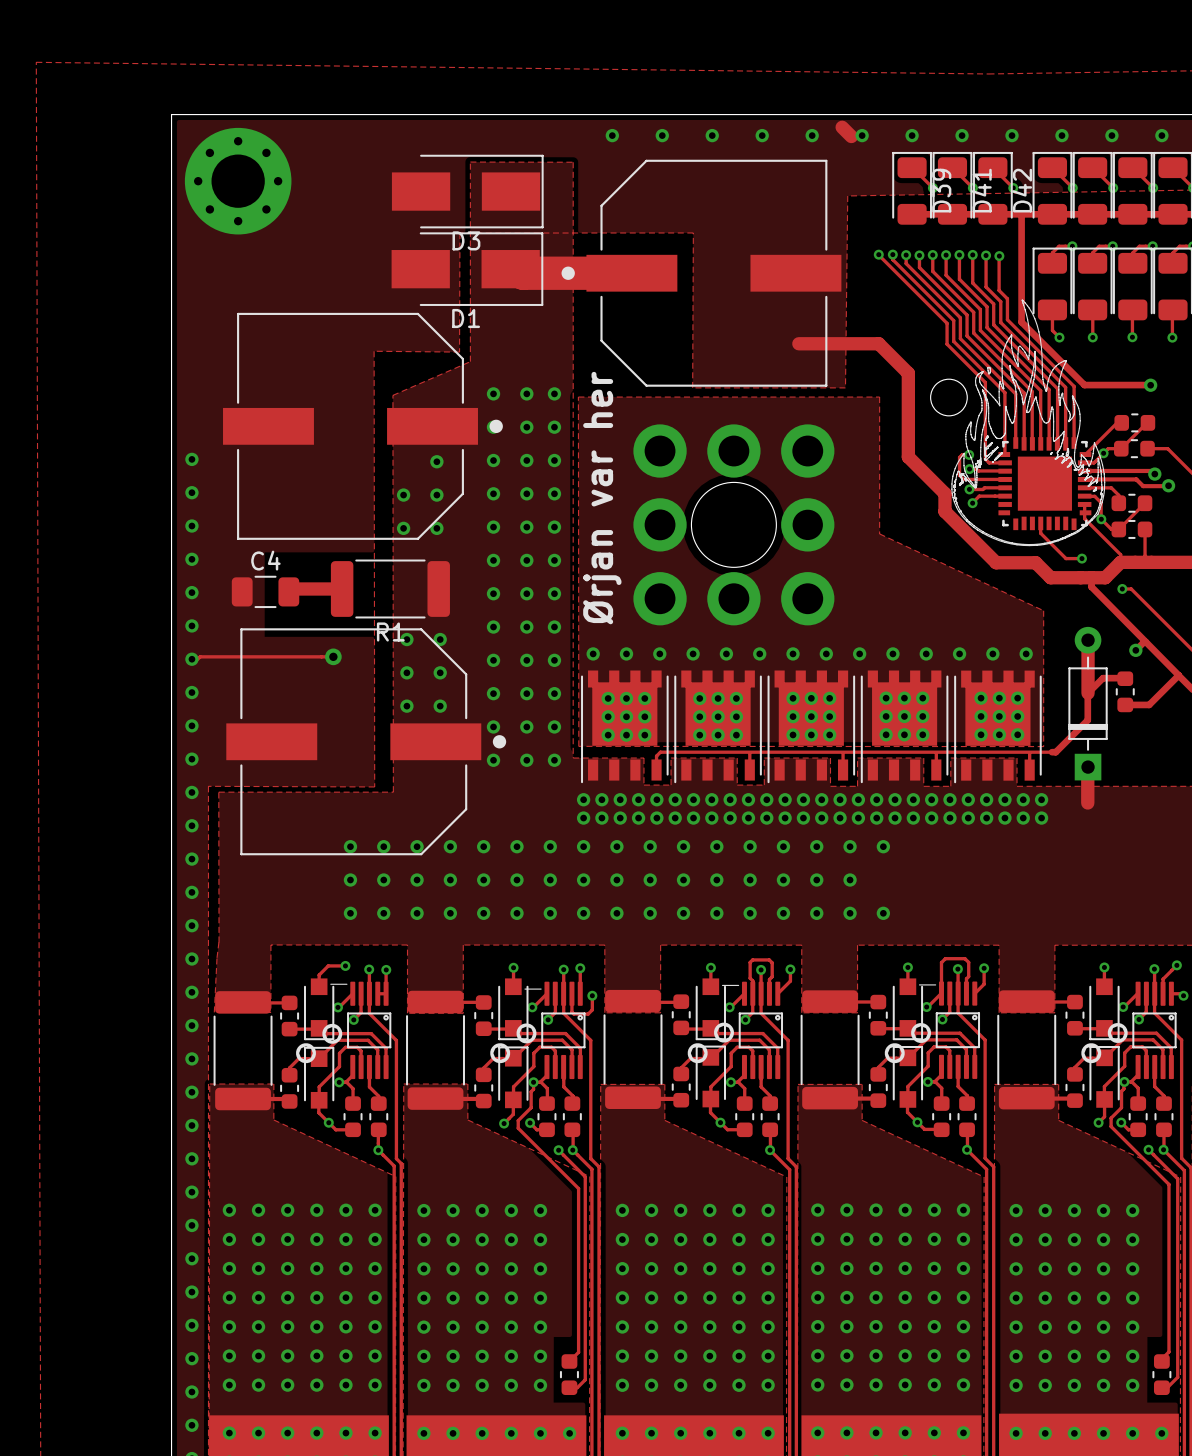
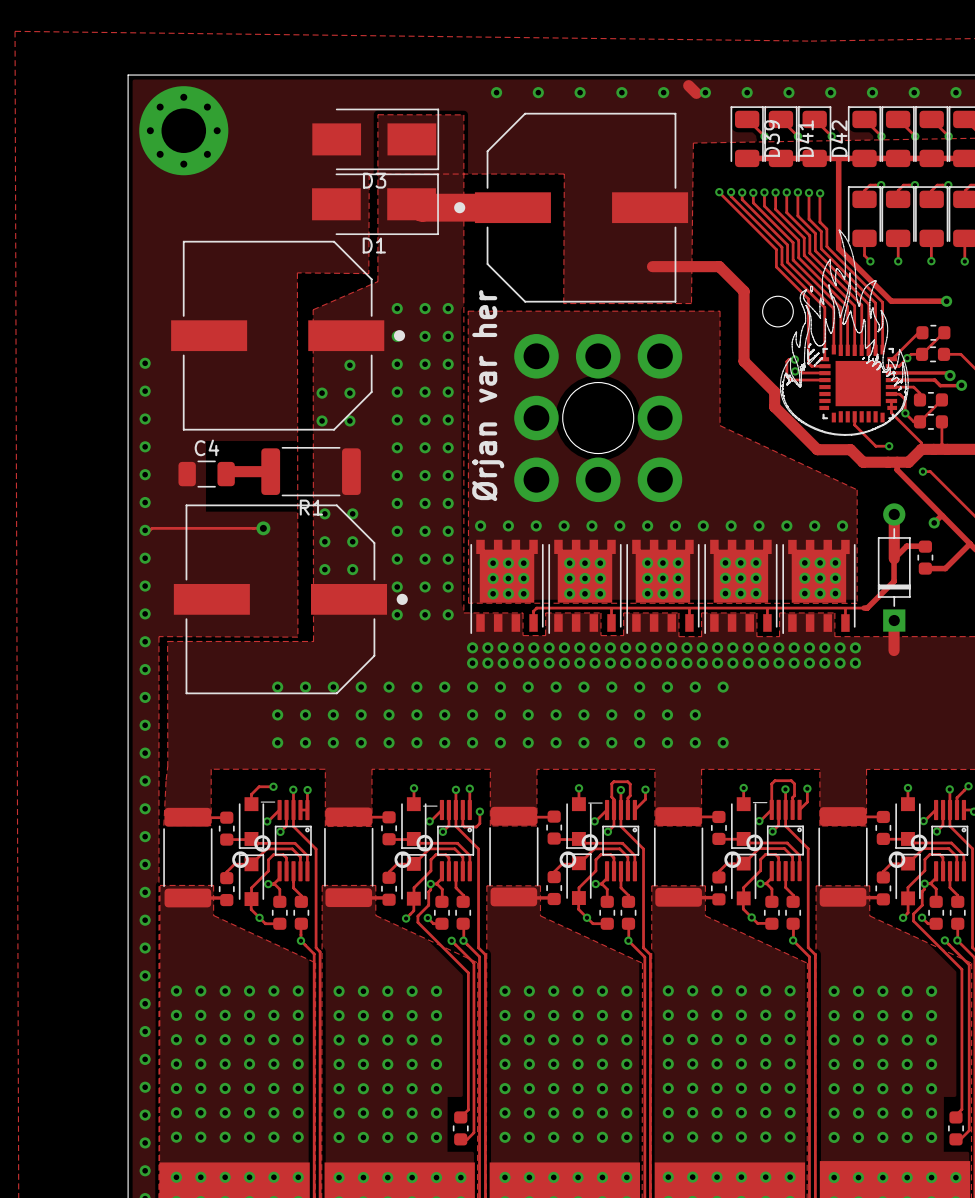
track: (1005, 487) (969, 489) -> none
via: (969, 489) -> none
track: (1005, 496) (979, 496) (972, 502) -> none
via: (972, 503) -> none

